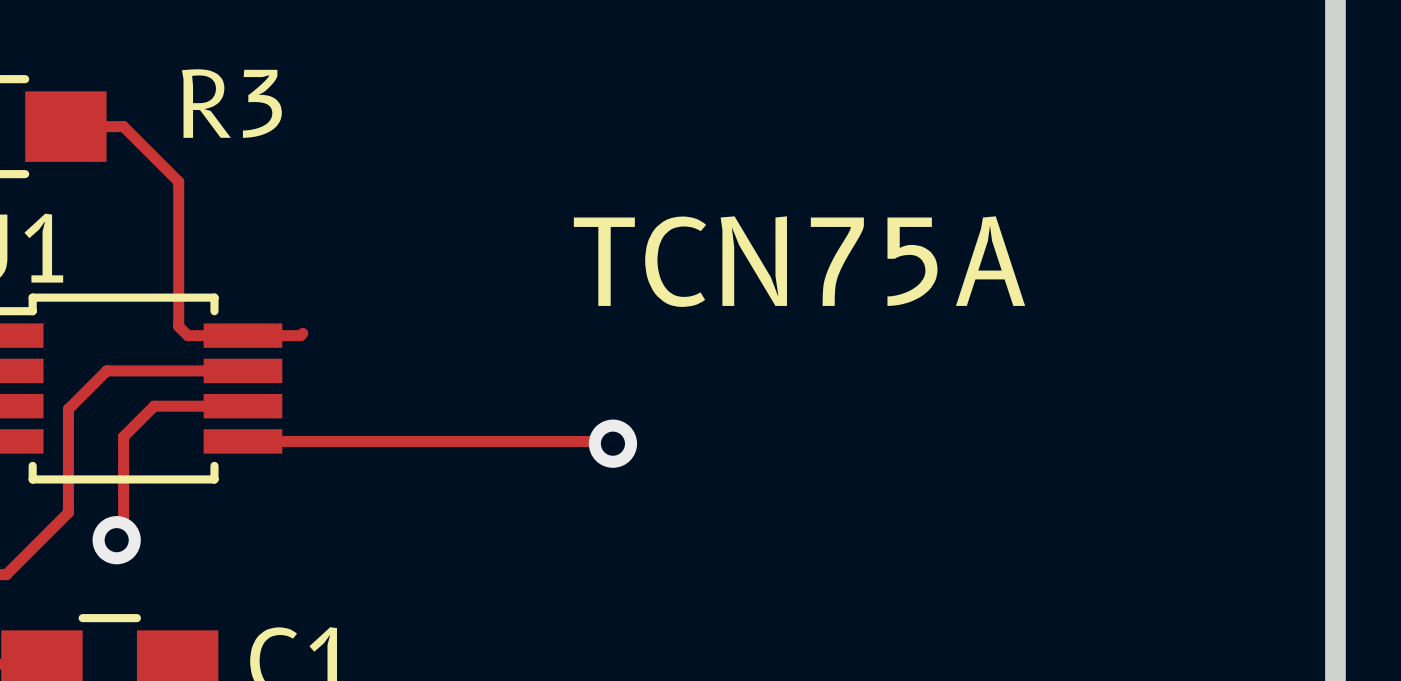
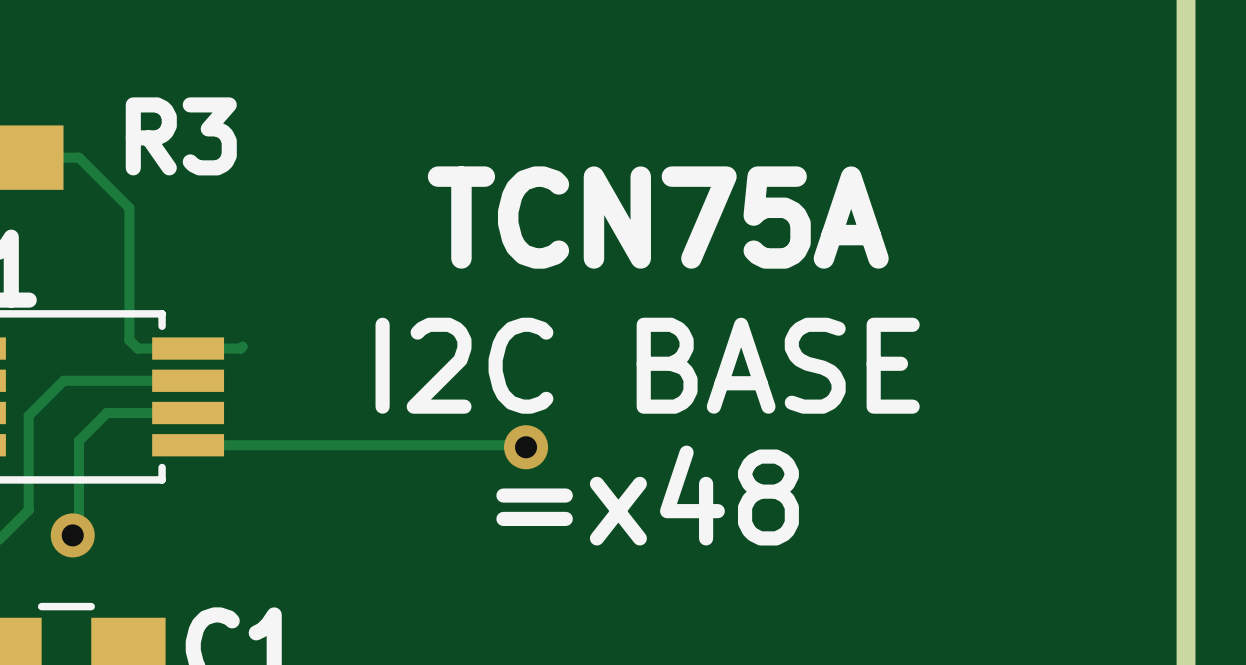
text position: TCN75A (799, 261) -> TCN75A (658, 217)
text: none -> I2C BASE (647, 365)
text: none -> =x48 (647, 495)

